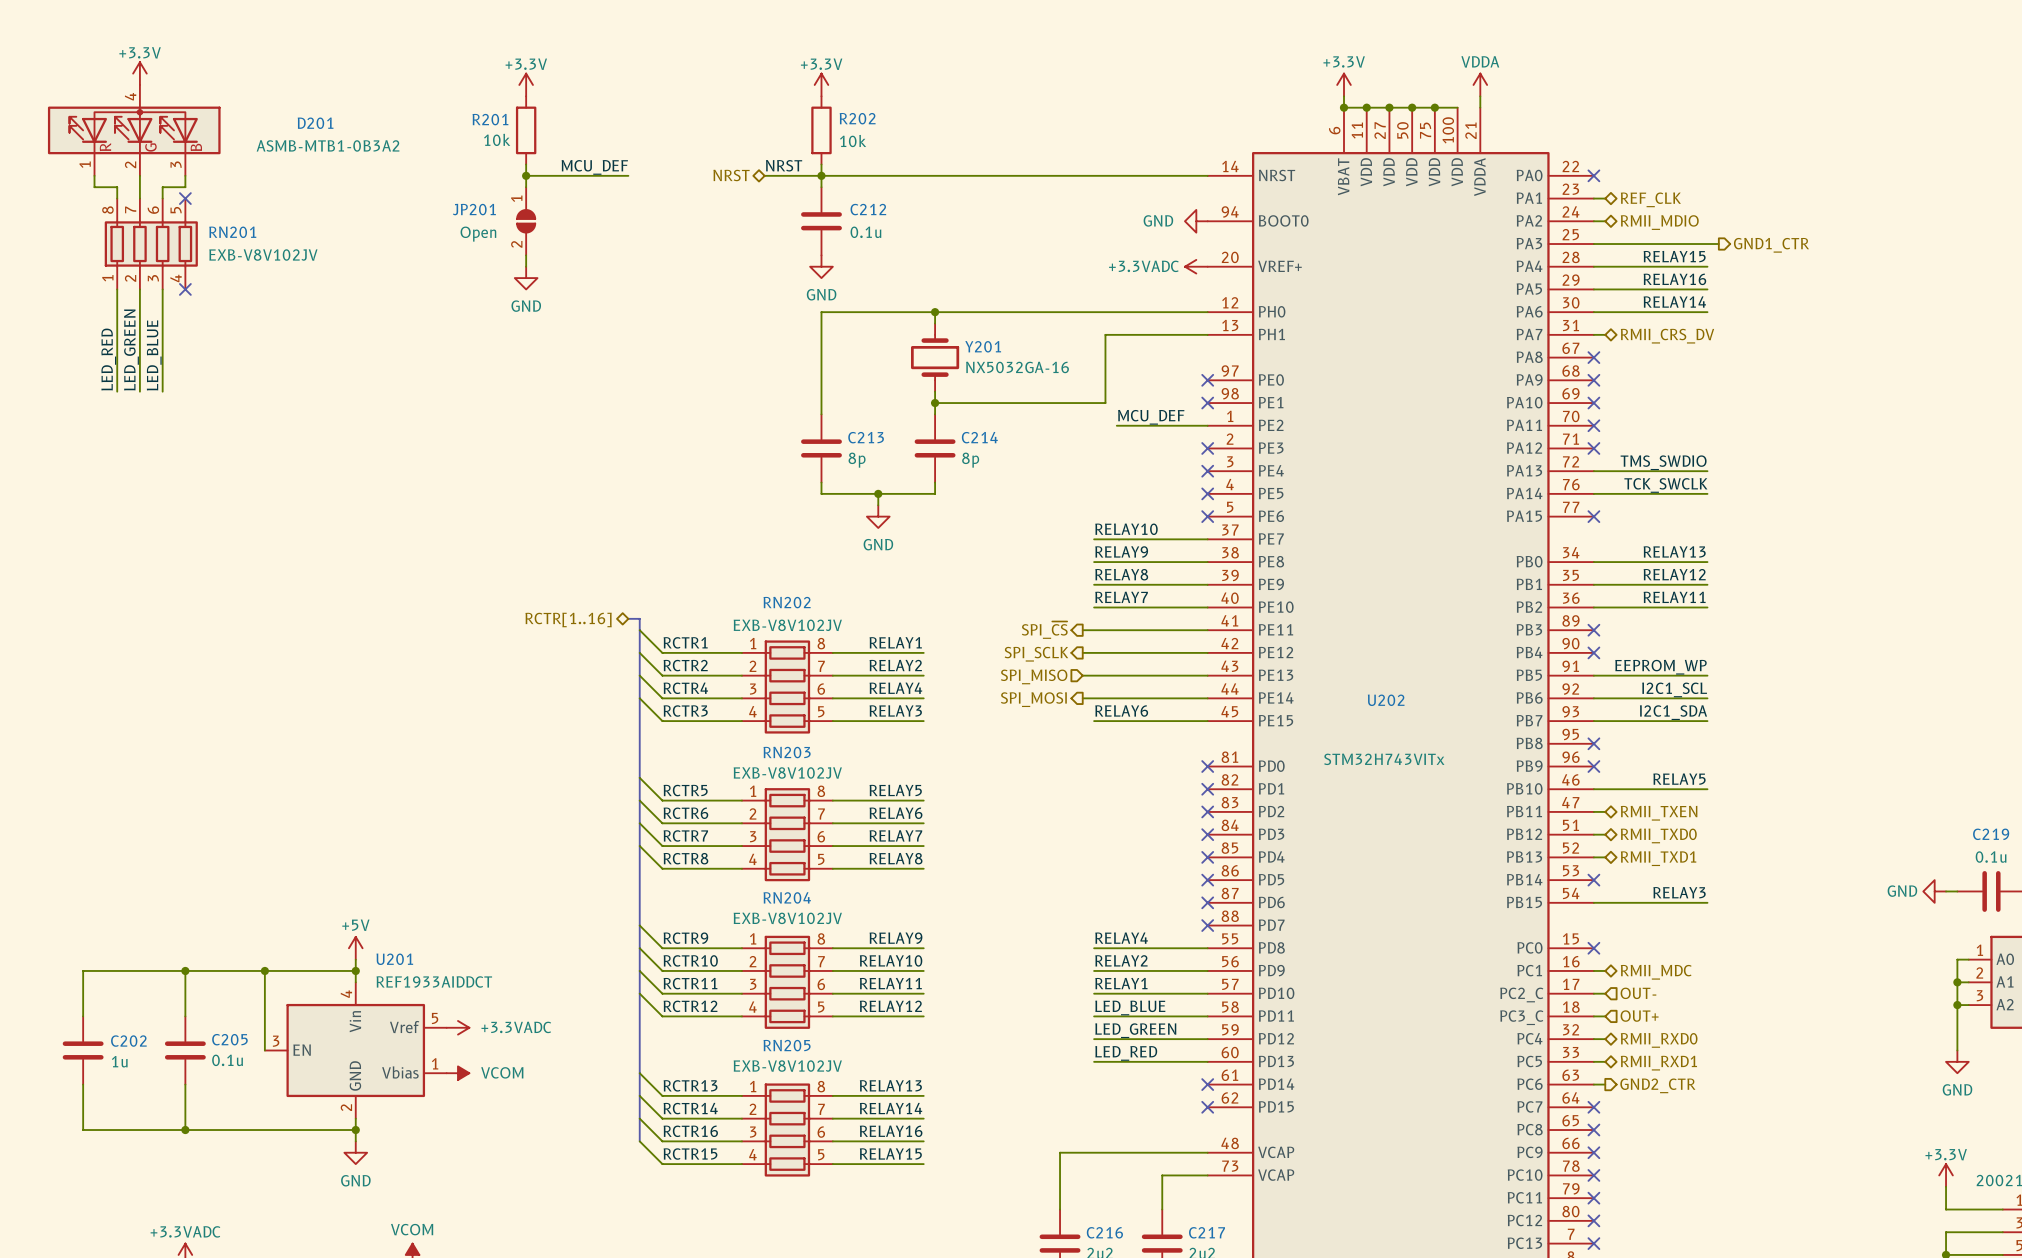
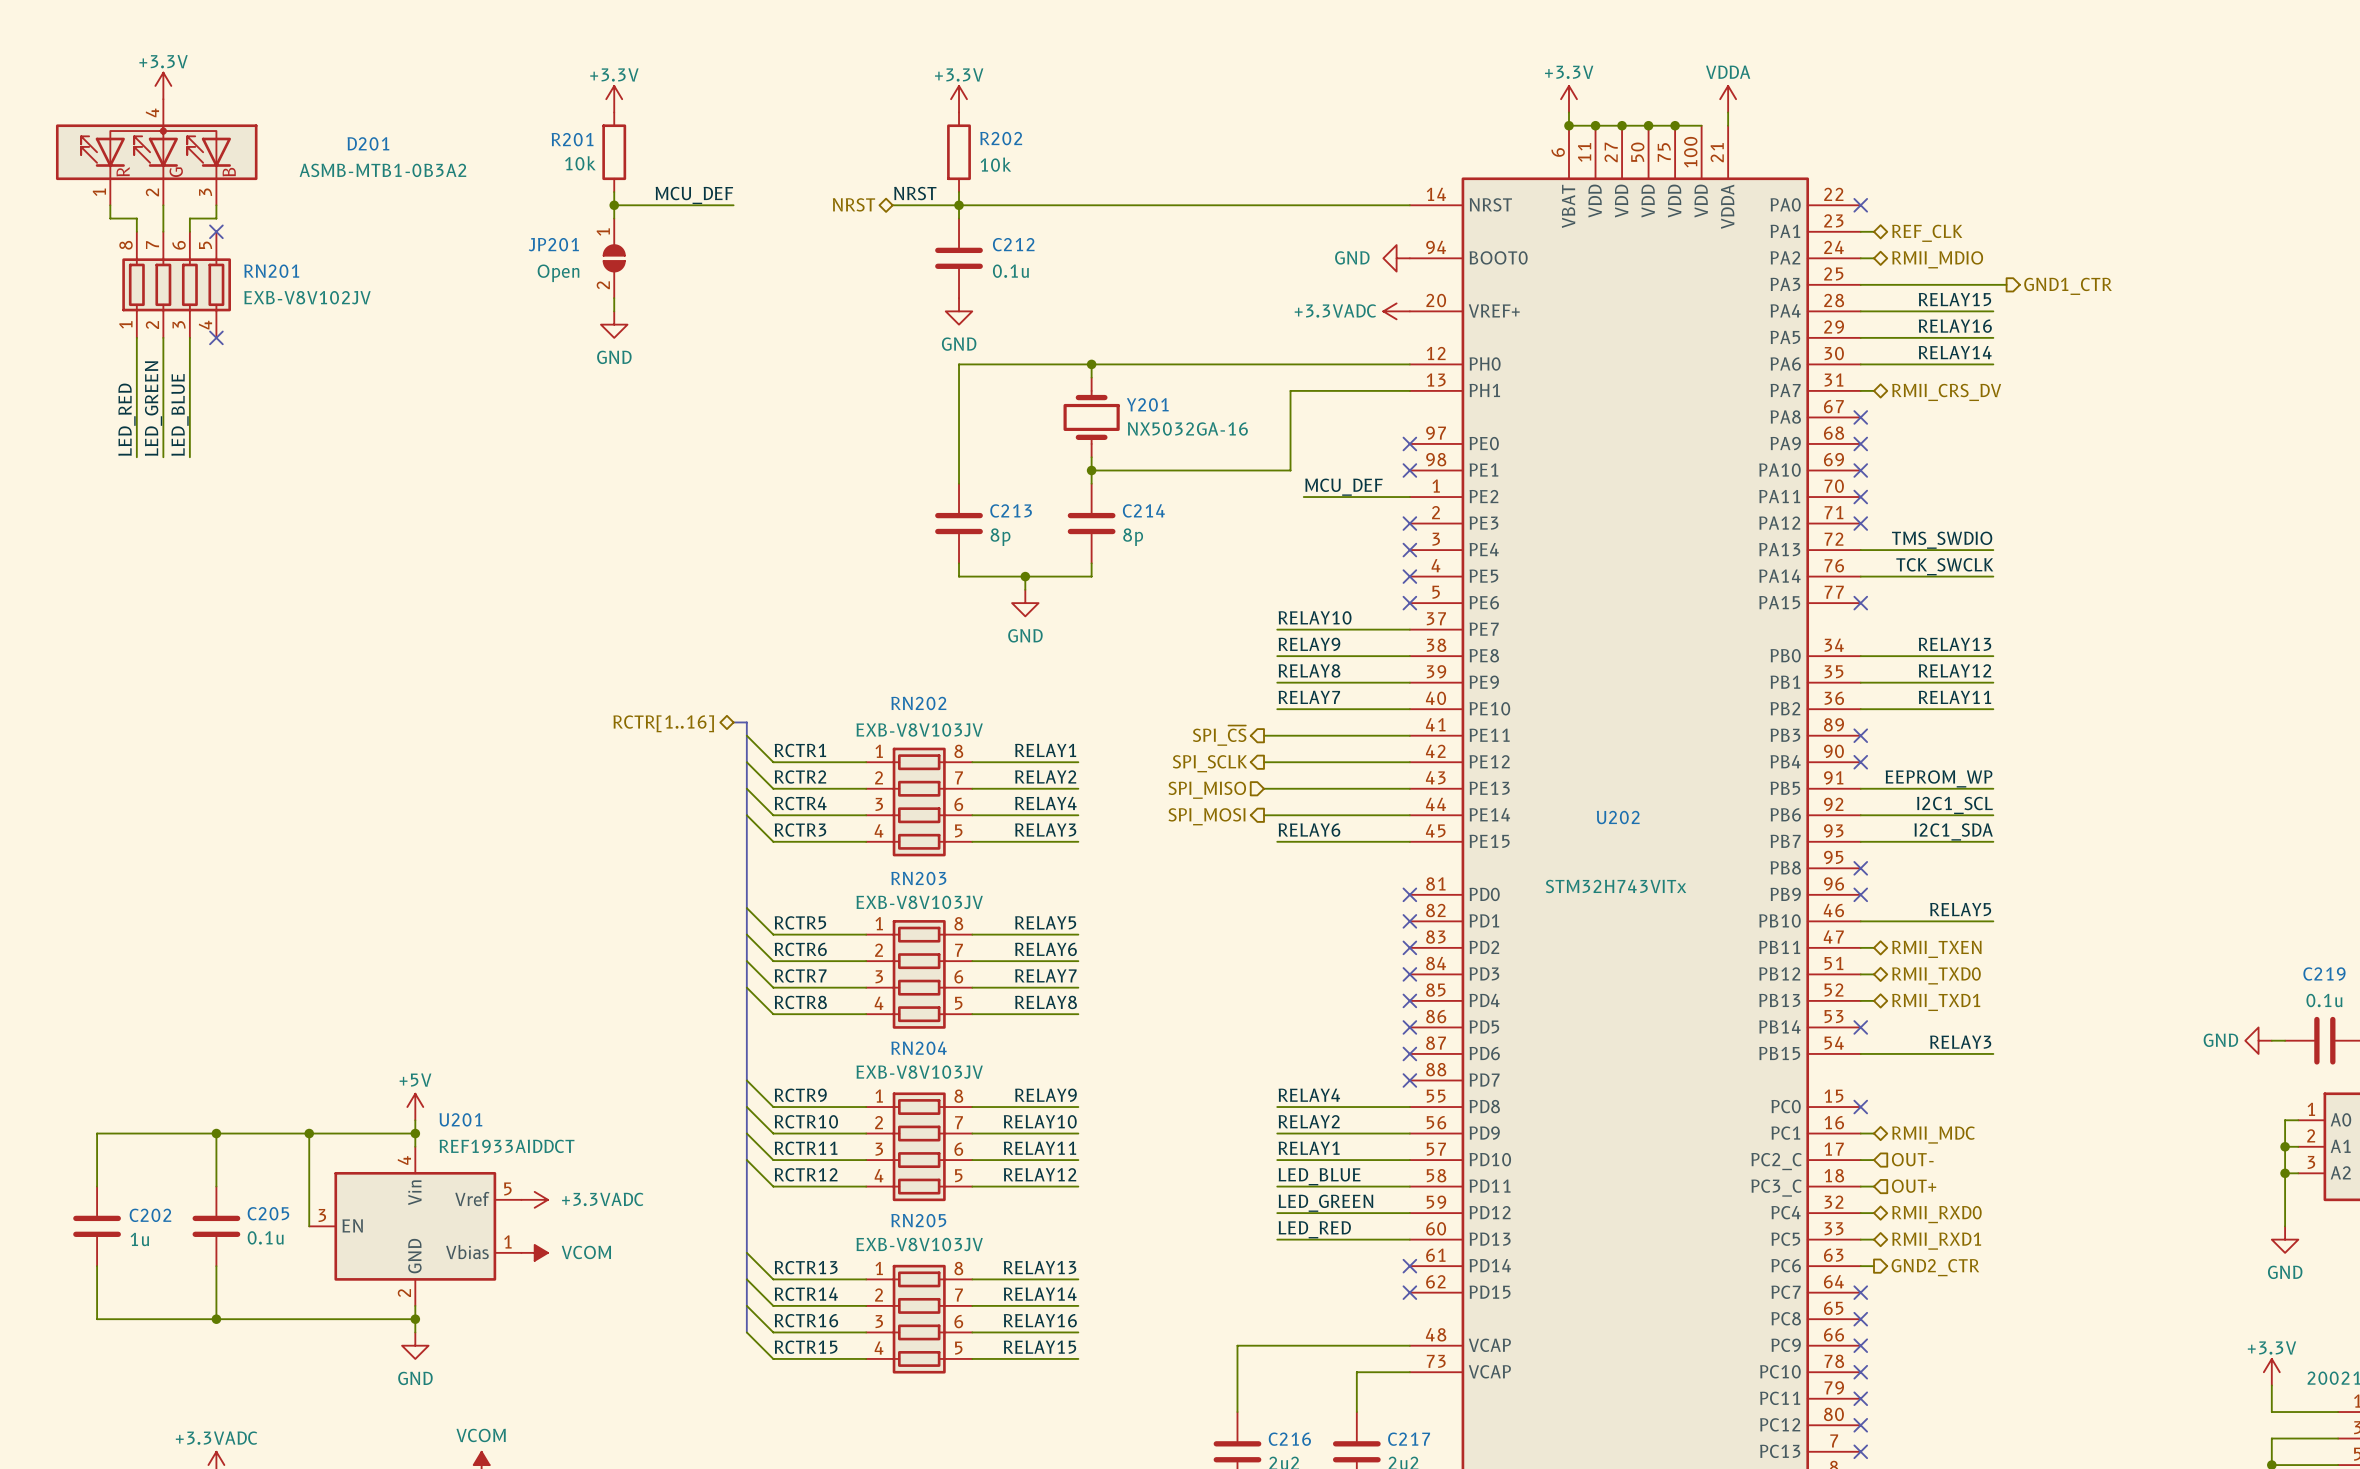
RN202 value: EXB-V8V102JV (787, 625) -> EXB-V8V103JV (919, 730)
RN203 value: EXB-V8V102JV (787, 772) -> EXB-V8V103JV (919, 902)
RN204 value: EXB-V8V102JV (787, 918) -> EXB-V8V103JV (919, 1072)
RN205 value: EXB-V8V102JV (787, 1066) -> EXB-V8V103JV (919, 1244)

